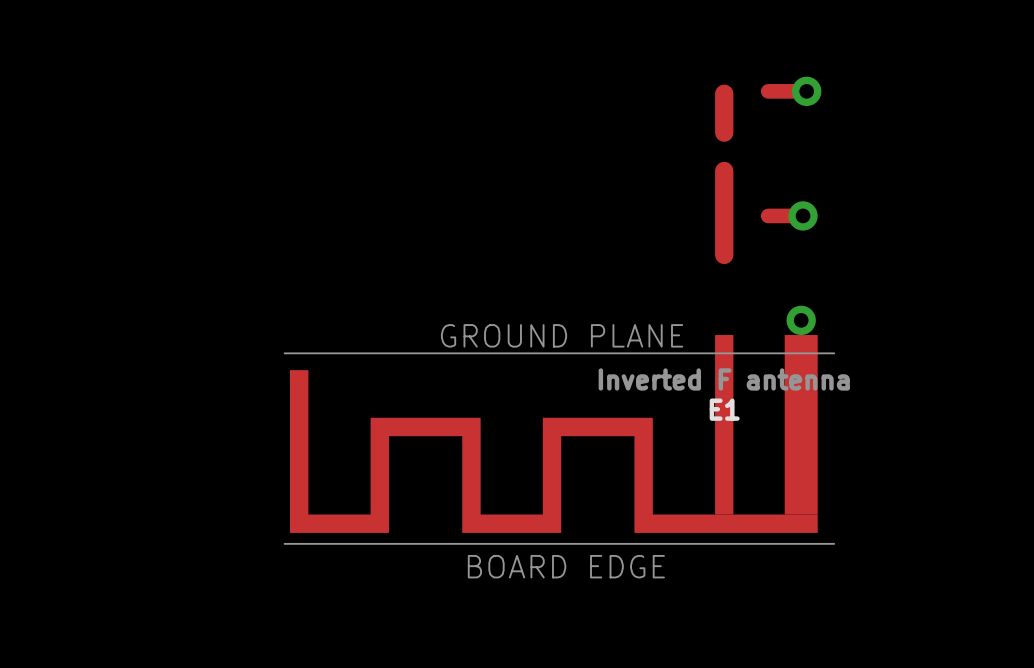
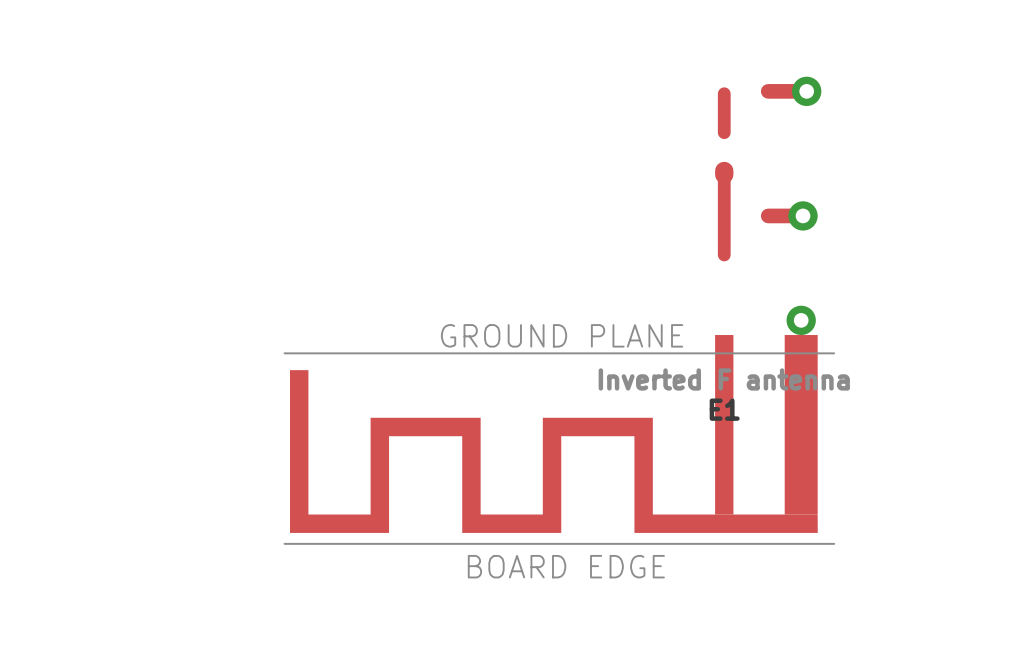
top track width: thick (724, 93) (724, 132) -> thin (724, 93) (724, 132)
top track width: thick (724, 174) (724, 254) -> thin (724, 174) (724, 254)

